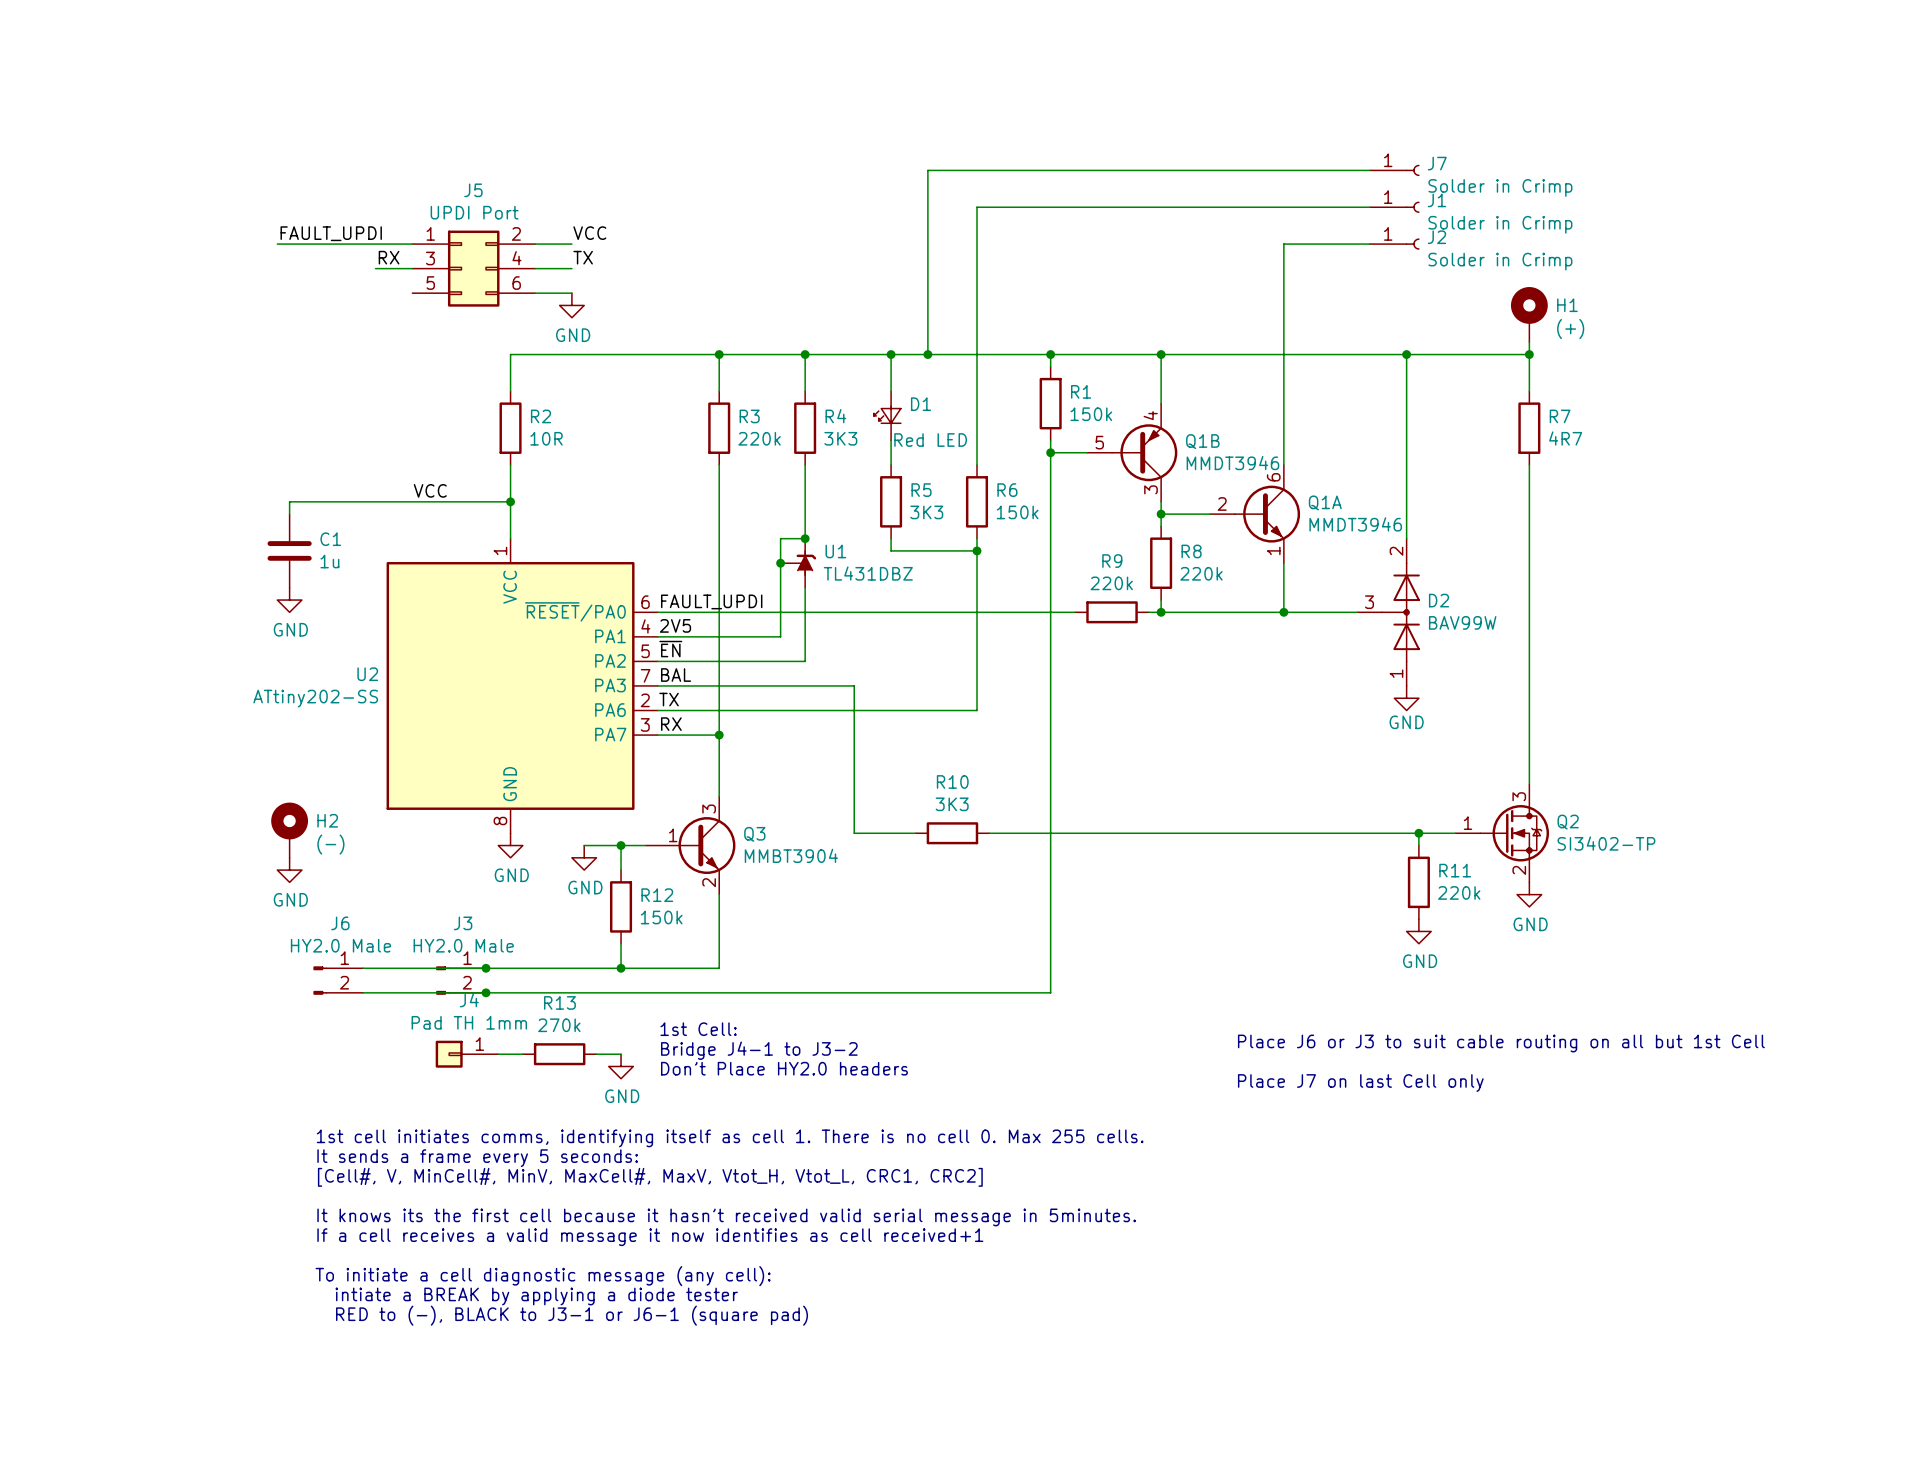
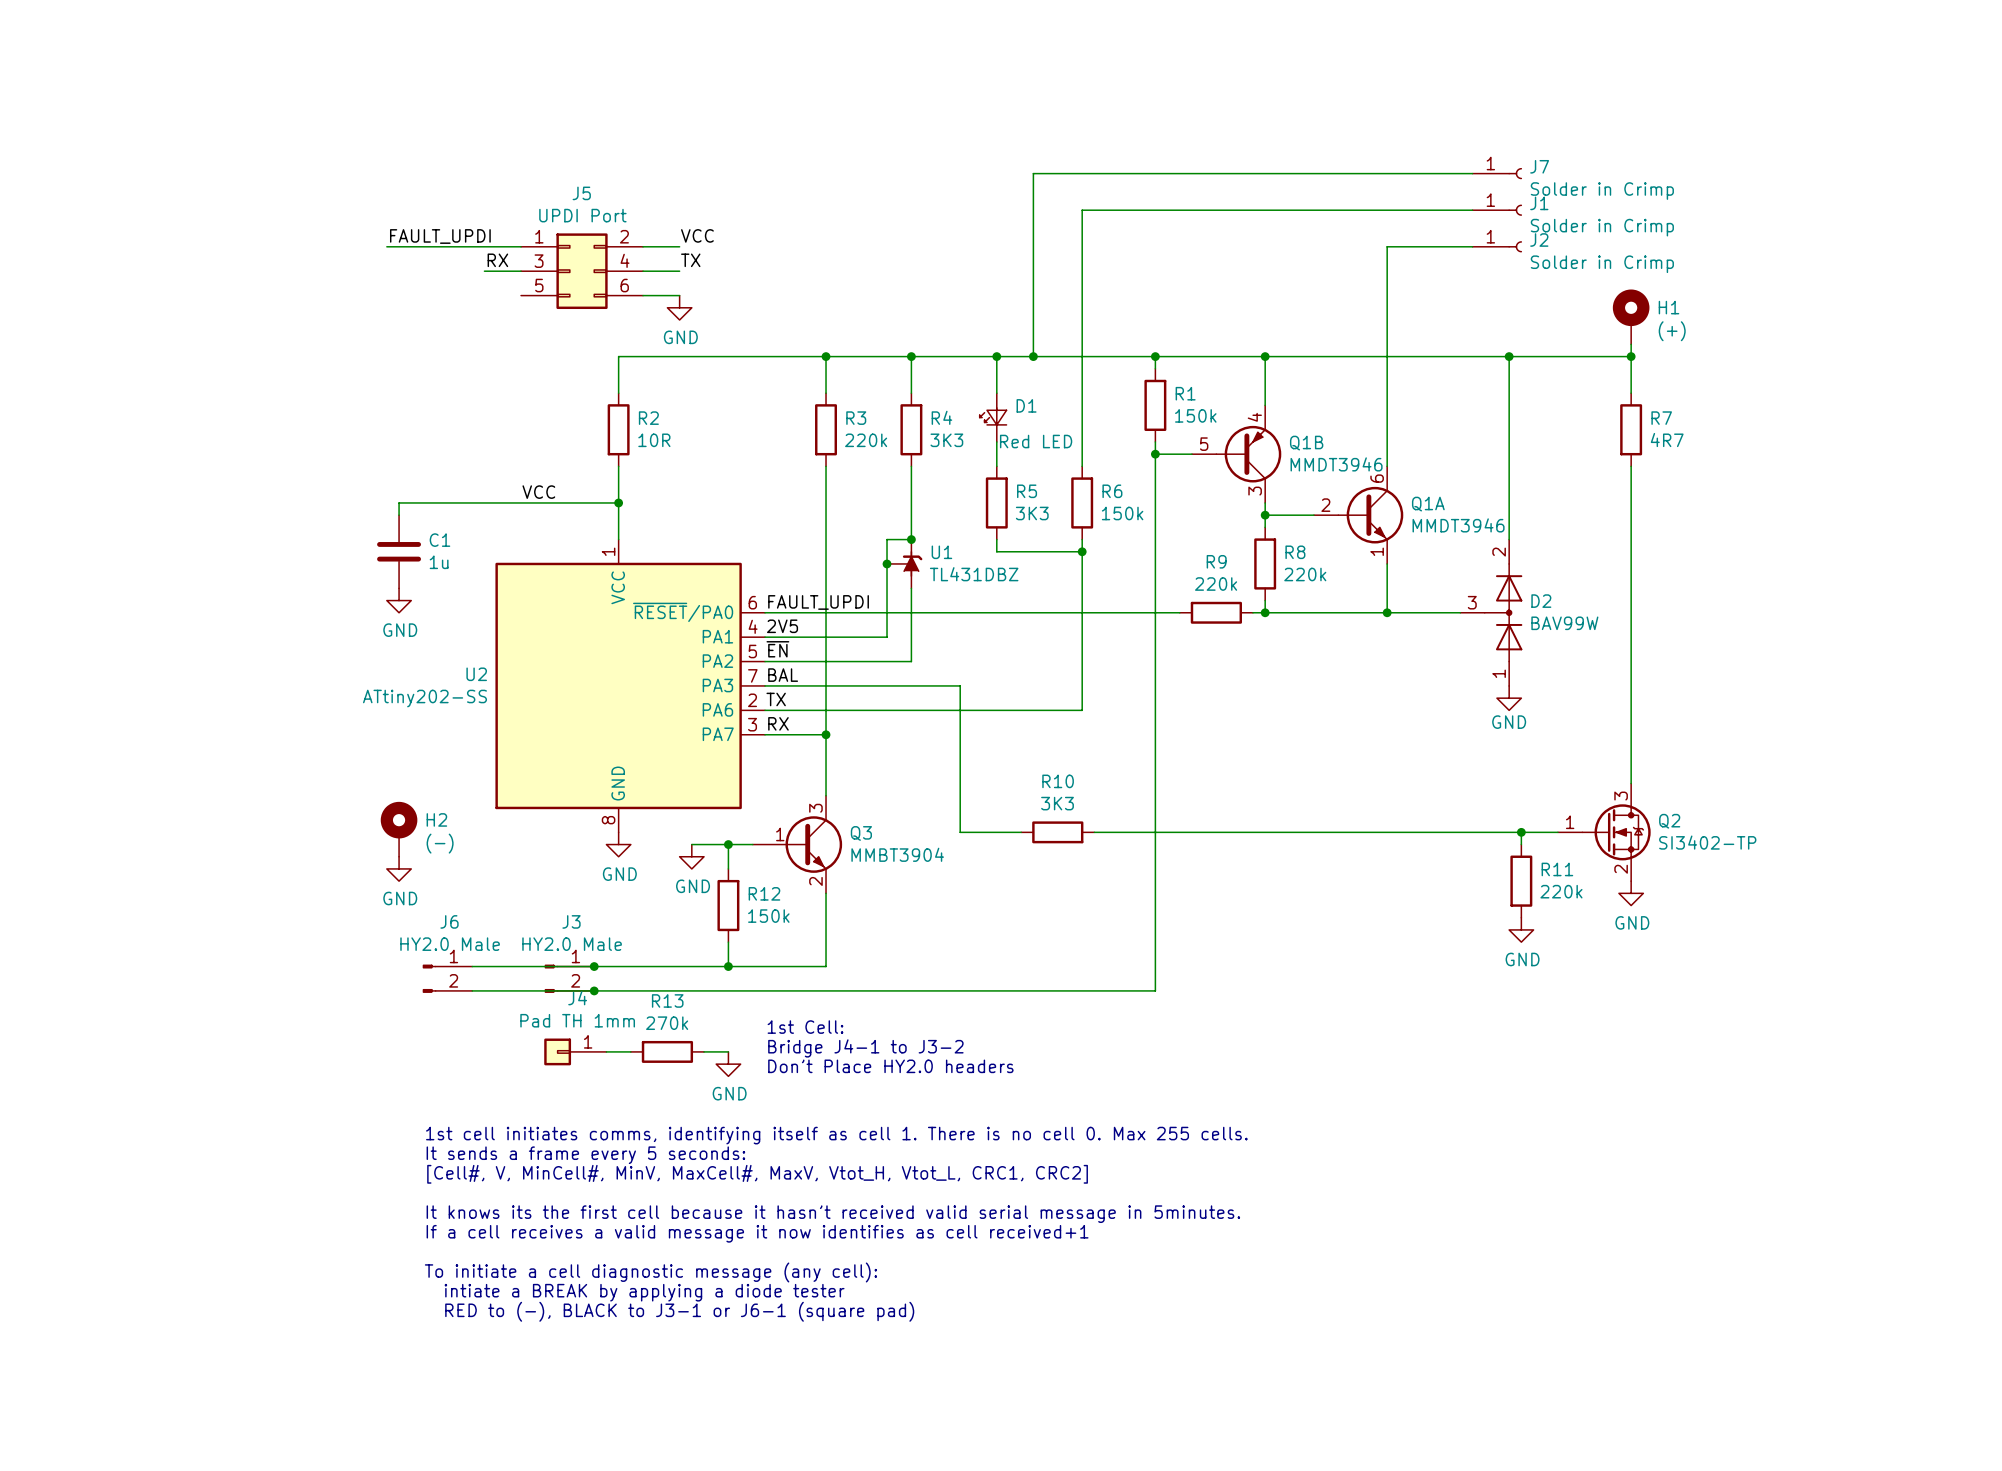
text: Place J6 or J3 to suit cable routing on all but 1st Cell (1501, 1043) -> none
text: Place J7 on last Cell only (1360, 1083) -> none

